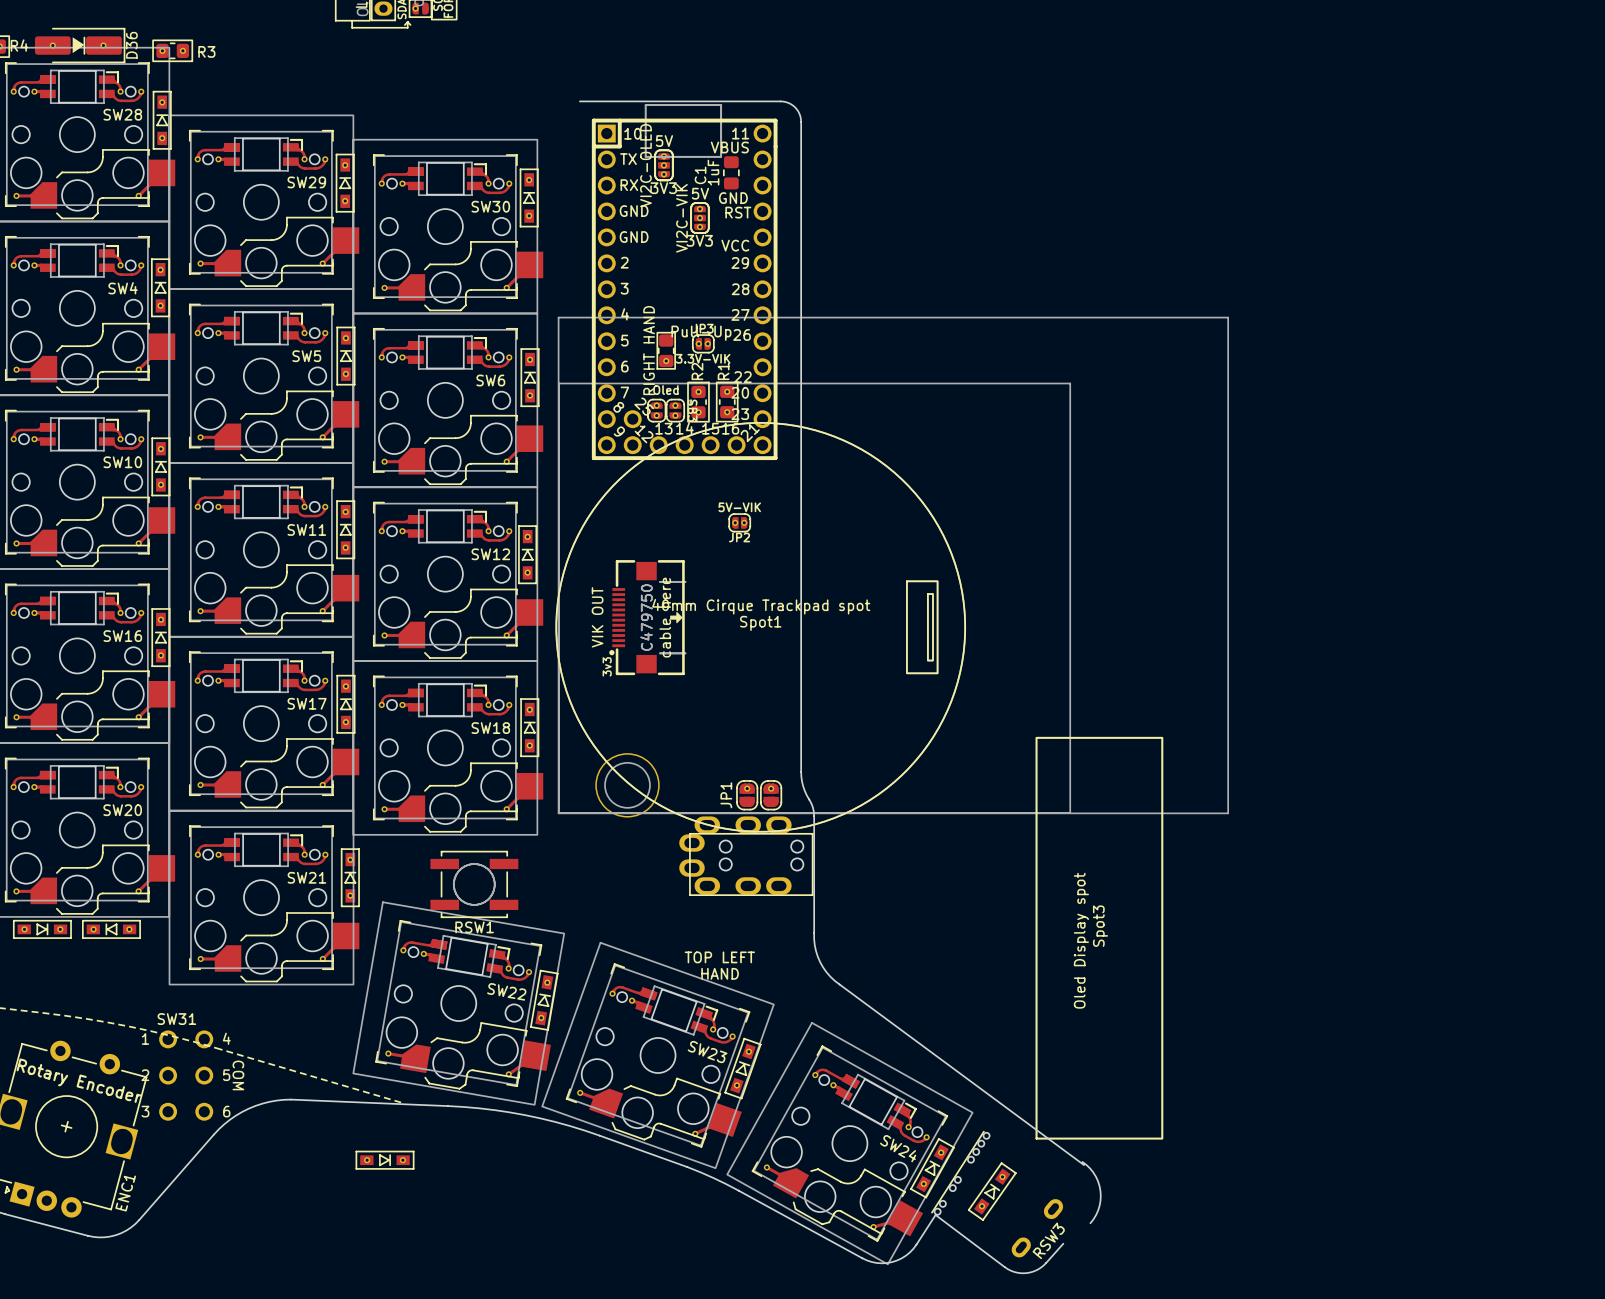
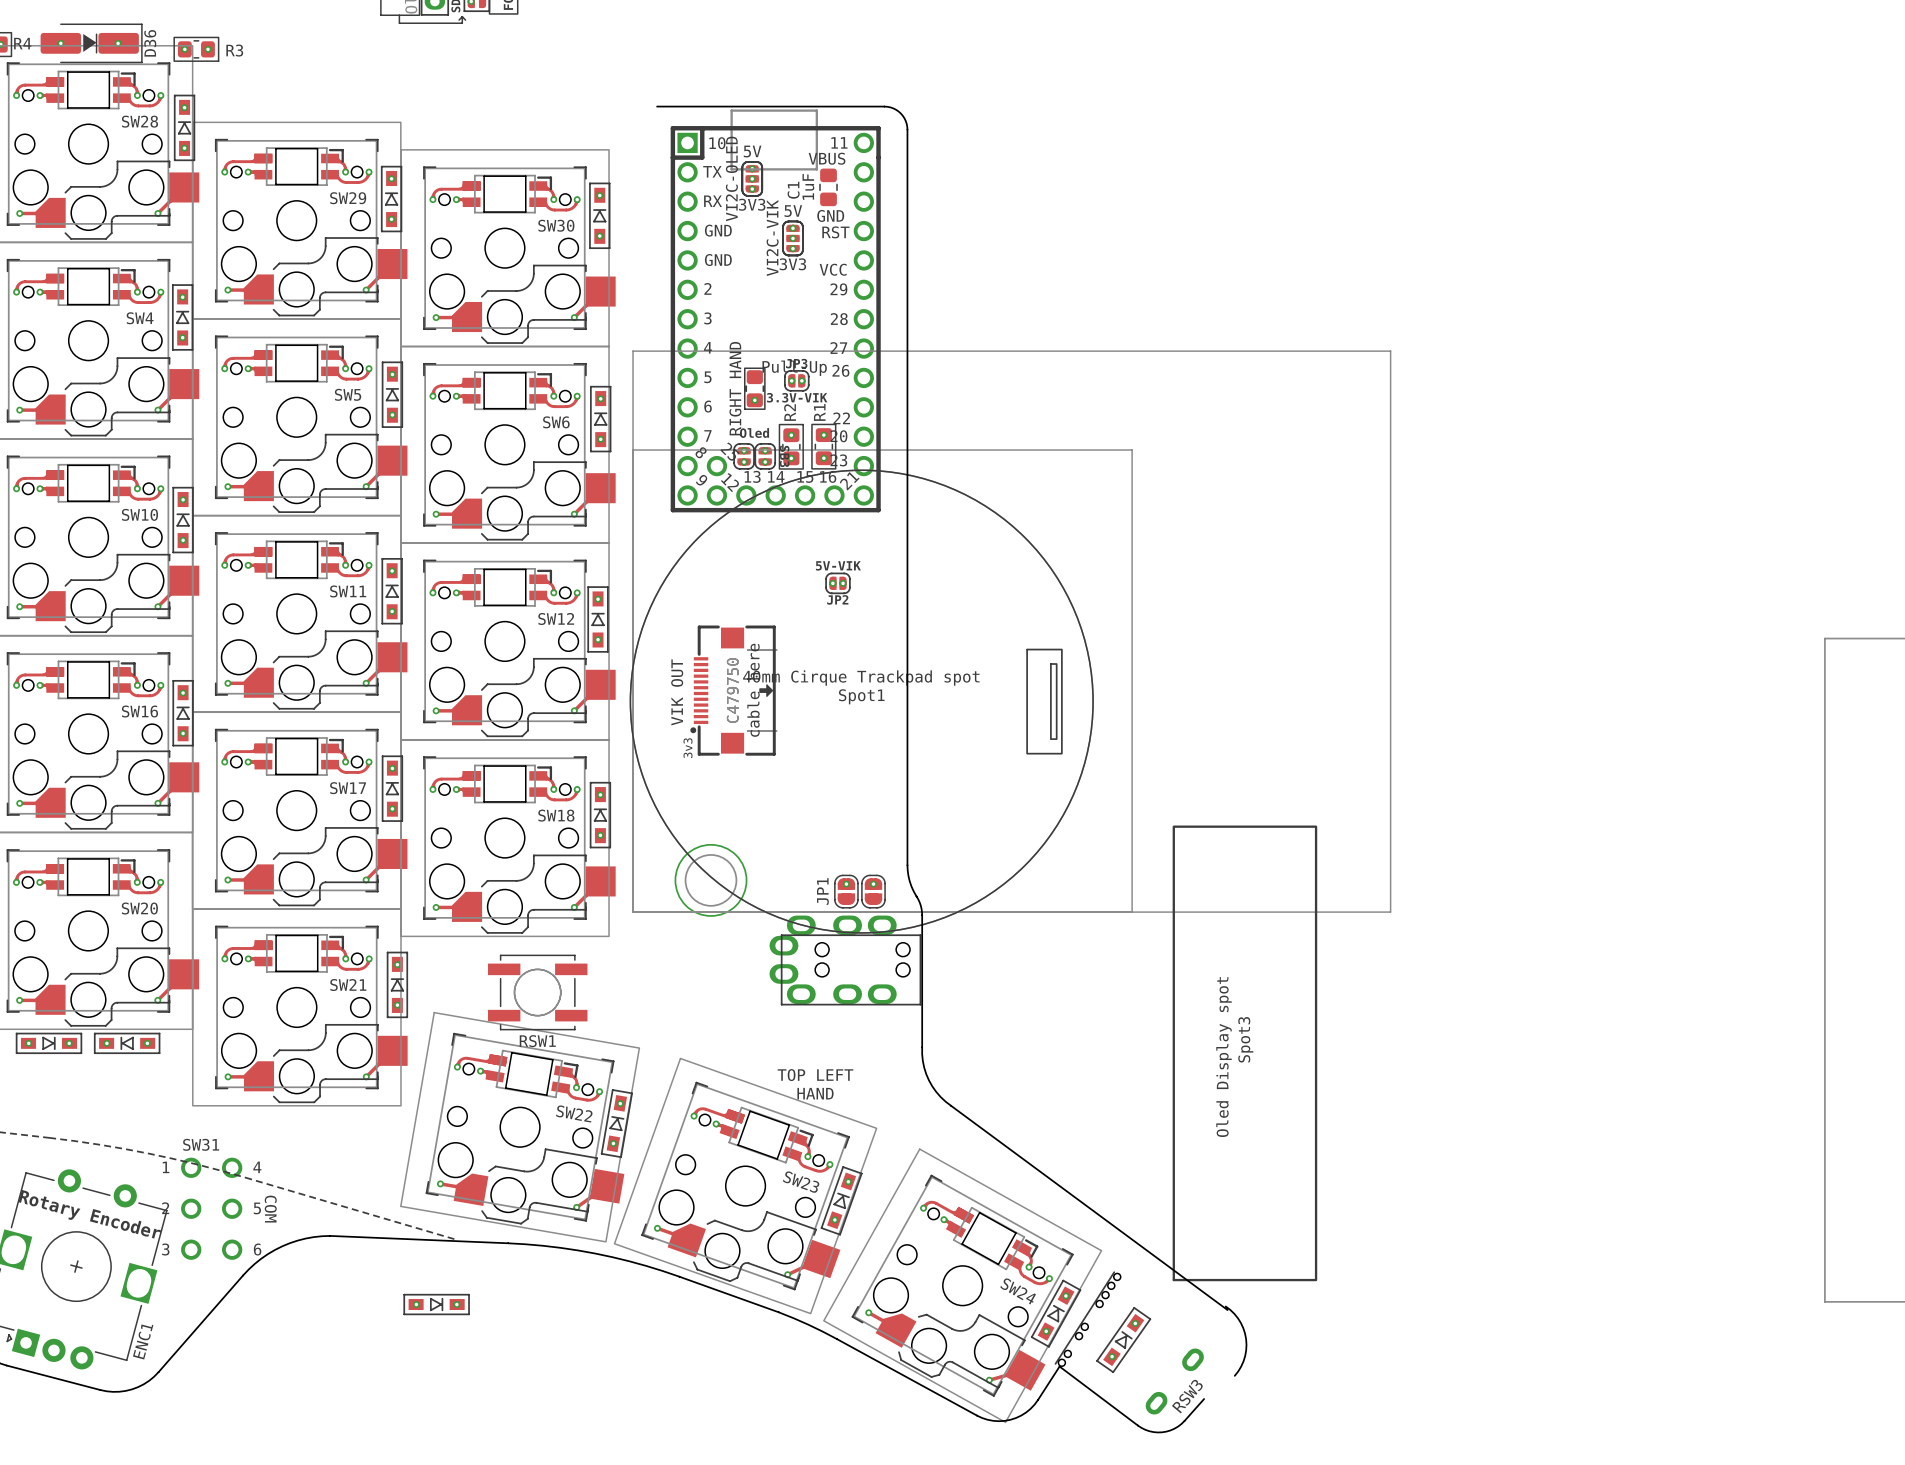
line: (559, 383) (1070, 383) (1070, 812) (559, 812) (559, 383) -> none
line: none -> (633, 450) (1132, 450) (1132, 912)

